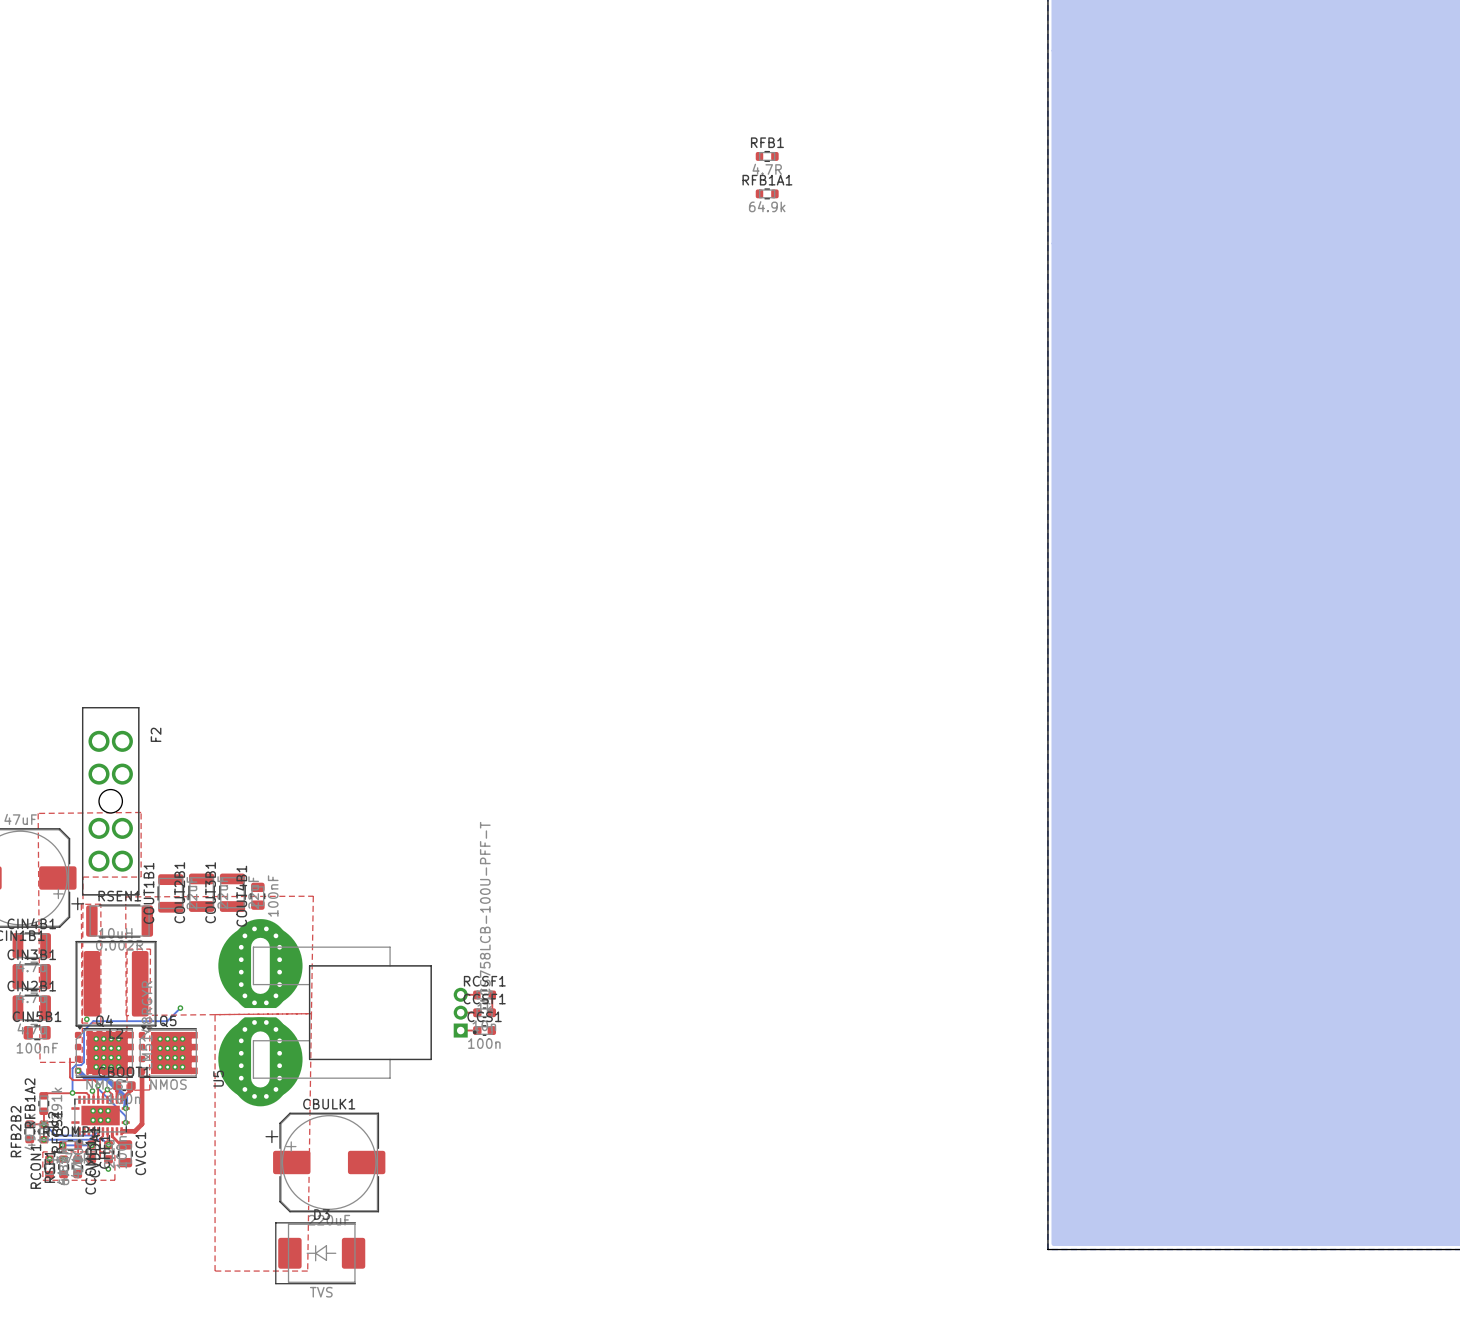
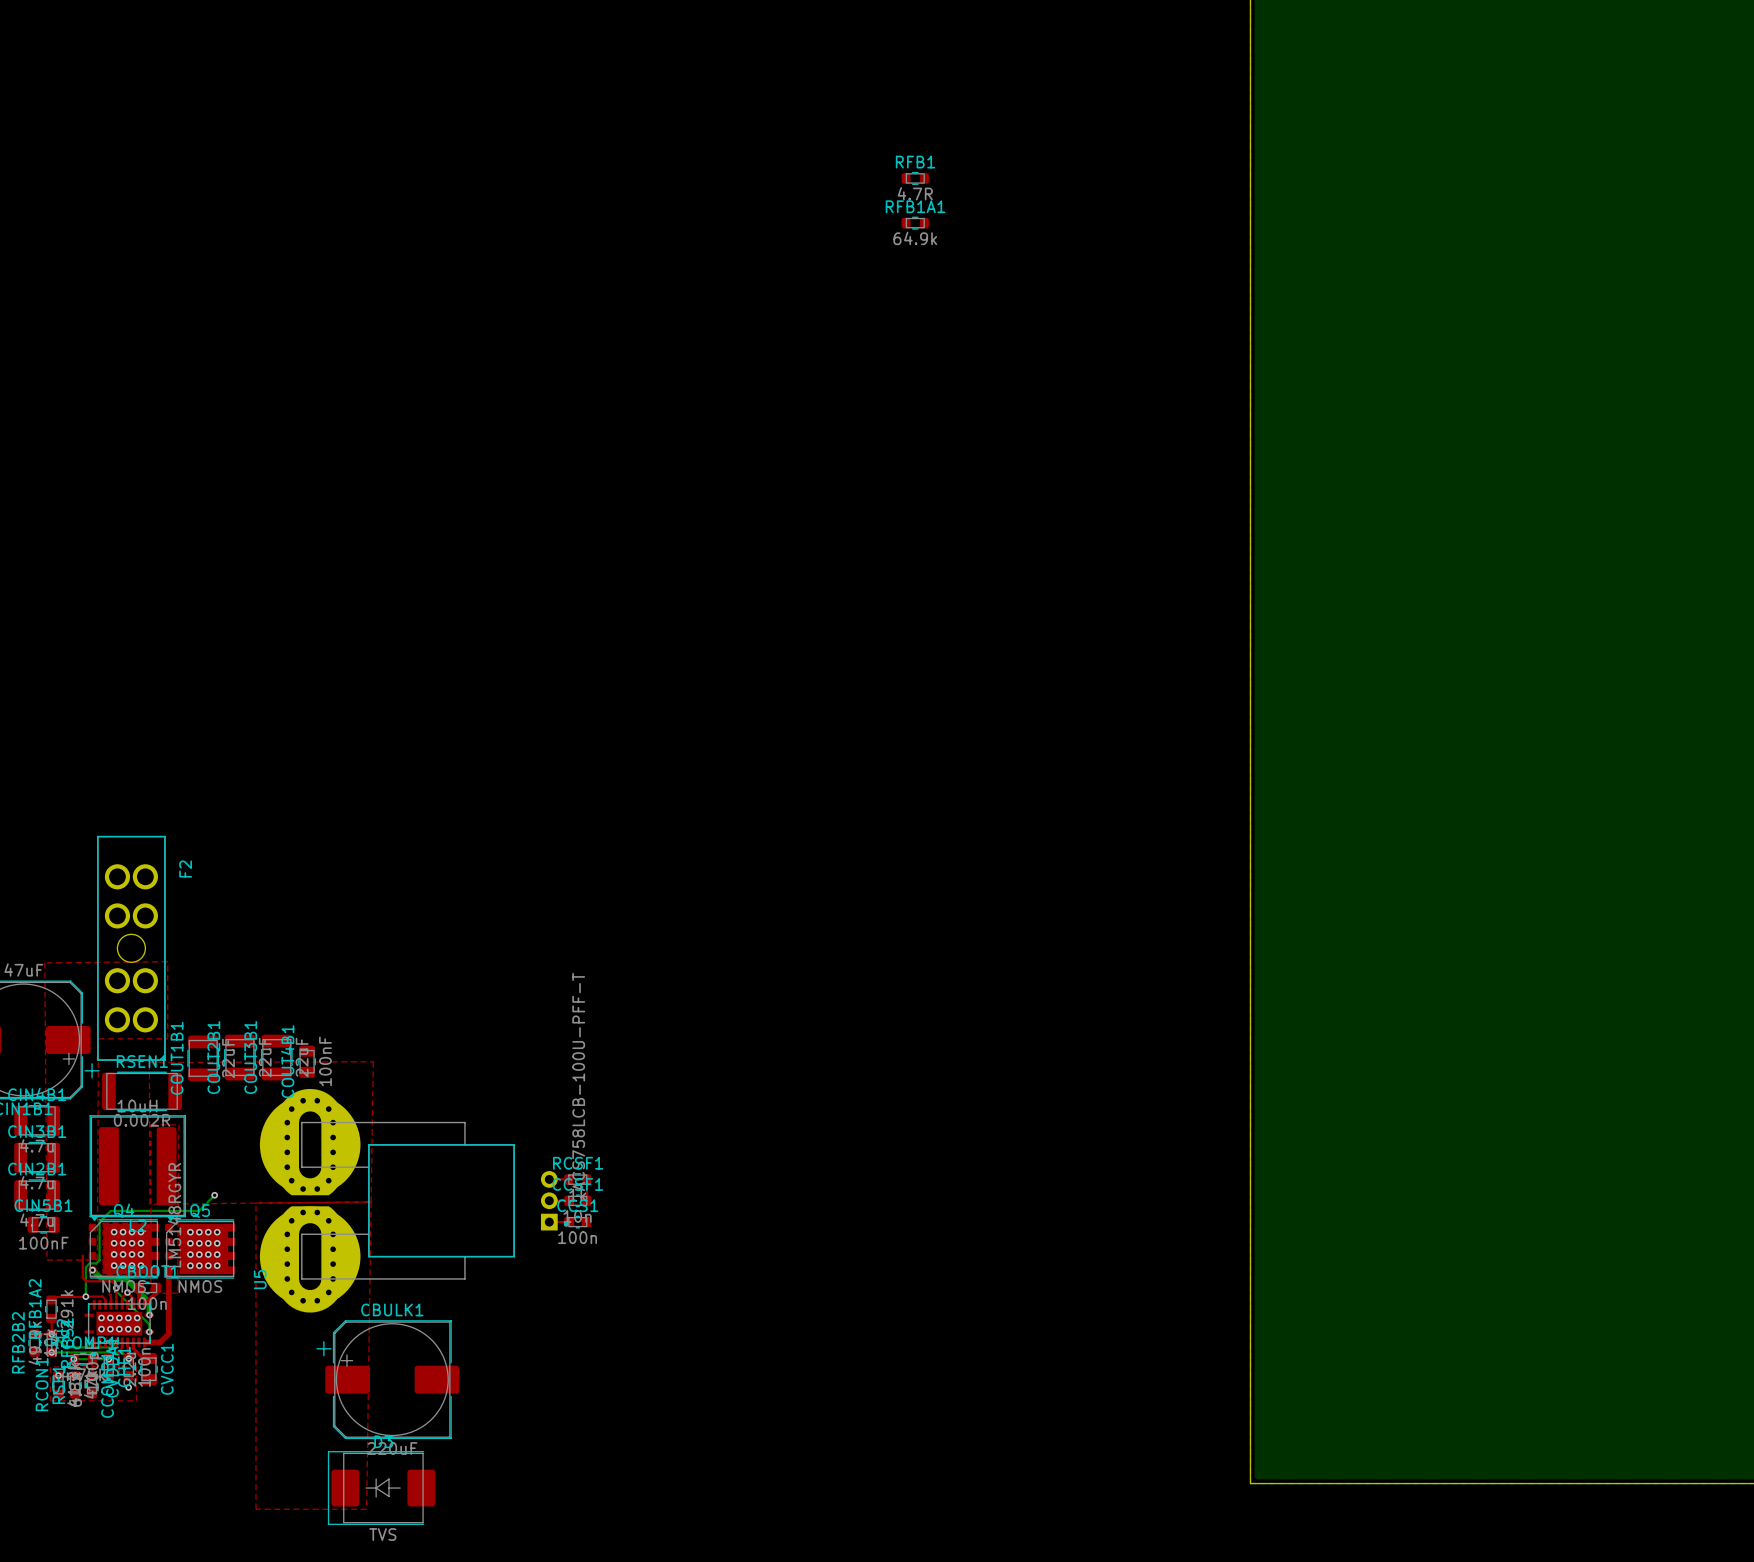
top zone outline: (100, 904) (100, 1023) (82, 1023) (81, 904) (100, 904) -> none
via: (86, 1019) -> none
via: (92, 1090) -> none
via: none -> (101, 1317)
via: none -> (137, 1317)
via: none -> (101, 1329)
via: none -> (137, 1329)

